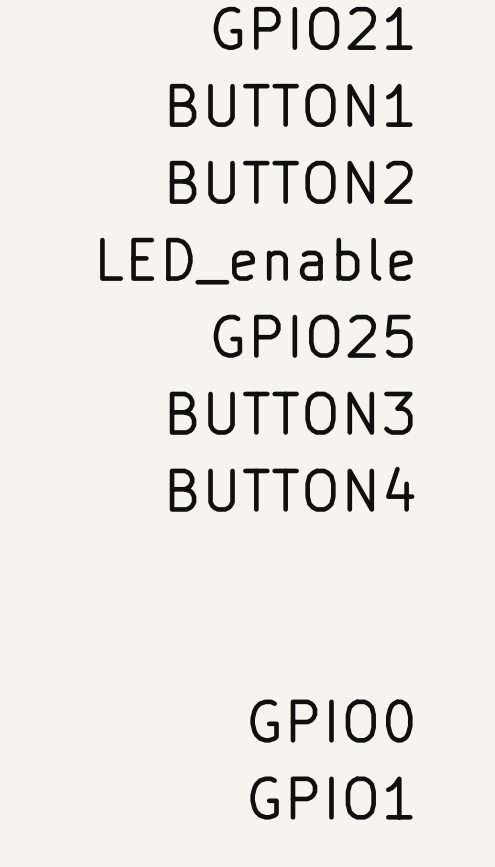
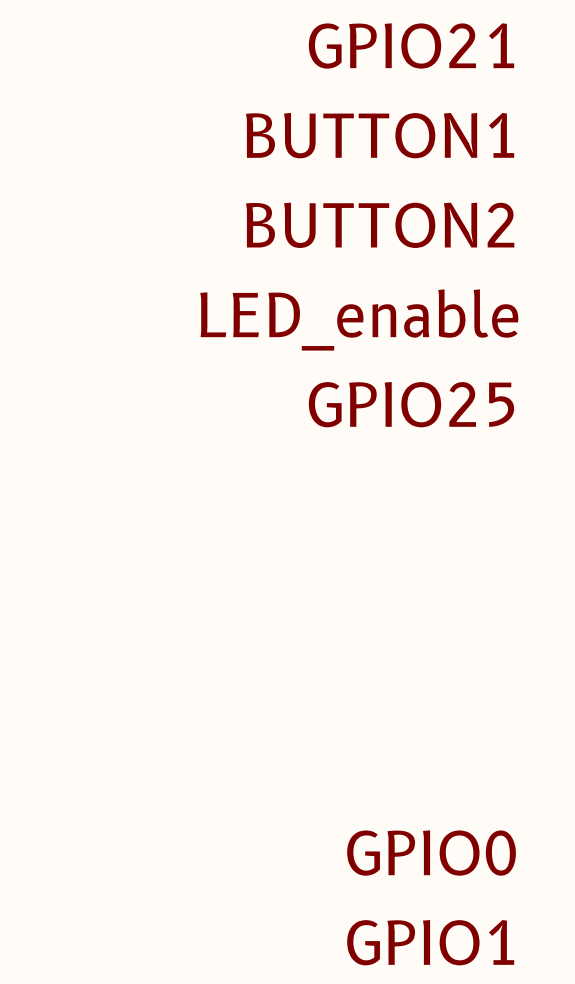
label: BUTTON3 (291, 413) -> none
label: BUTTON4 (292, 489) -> none

